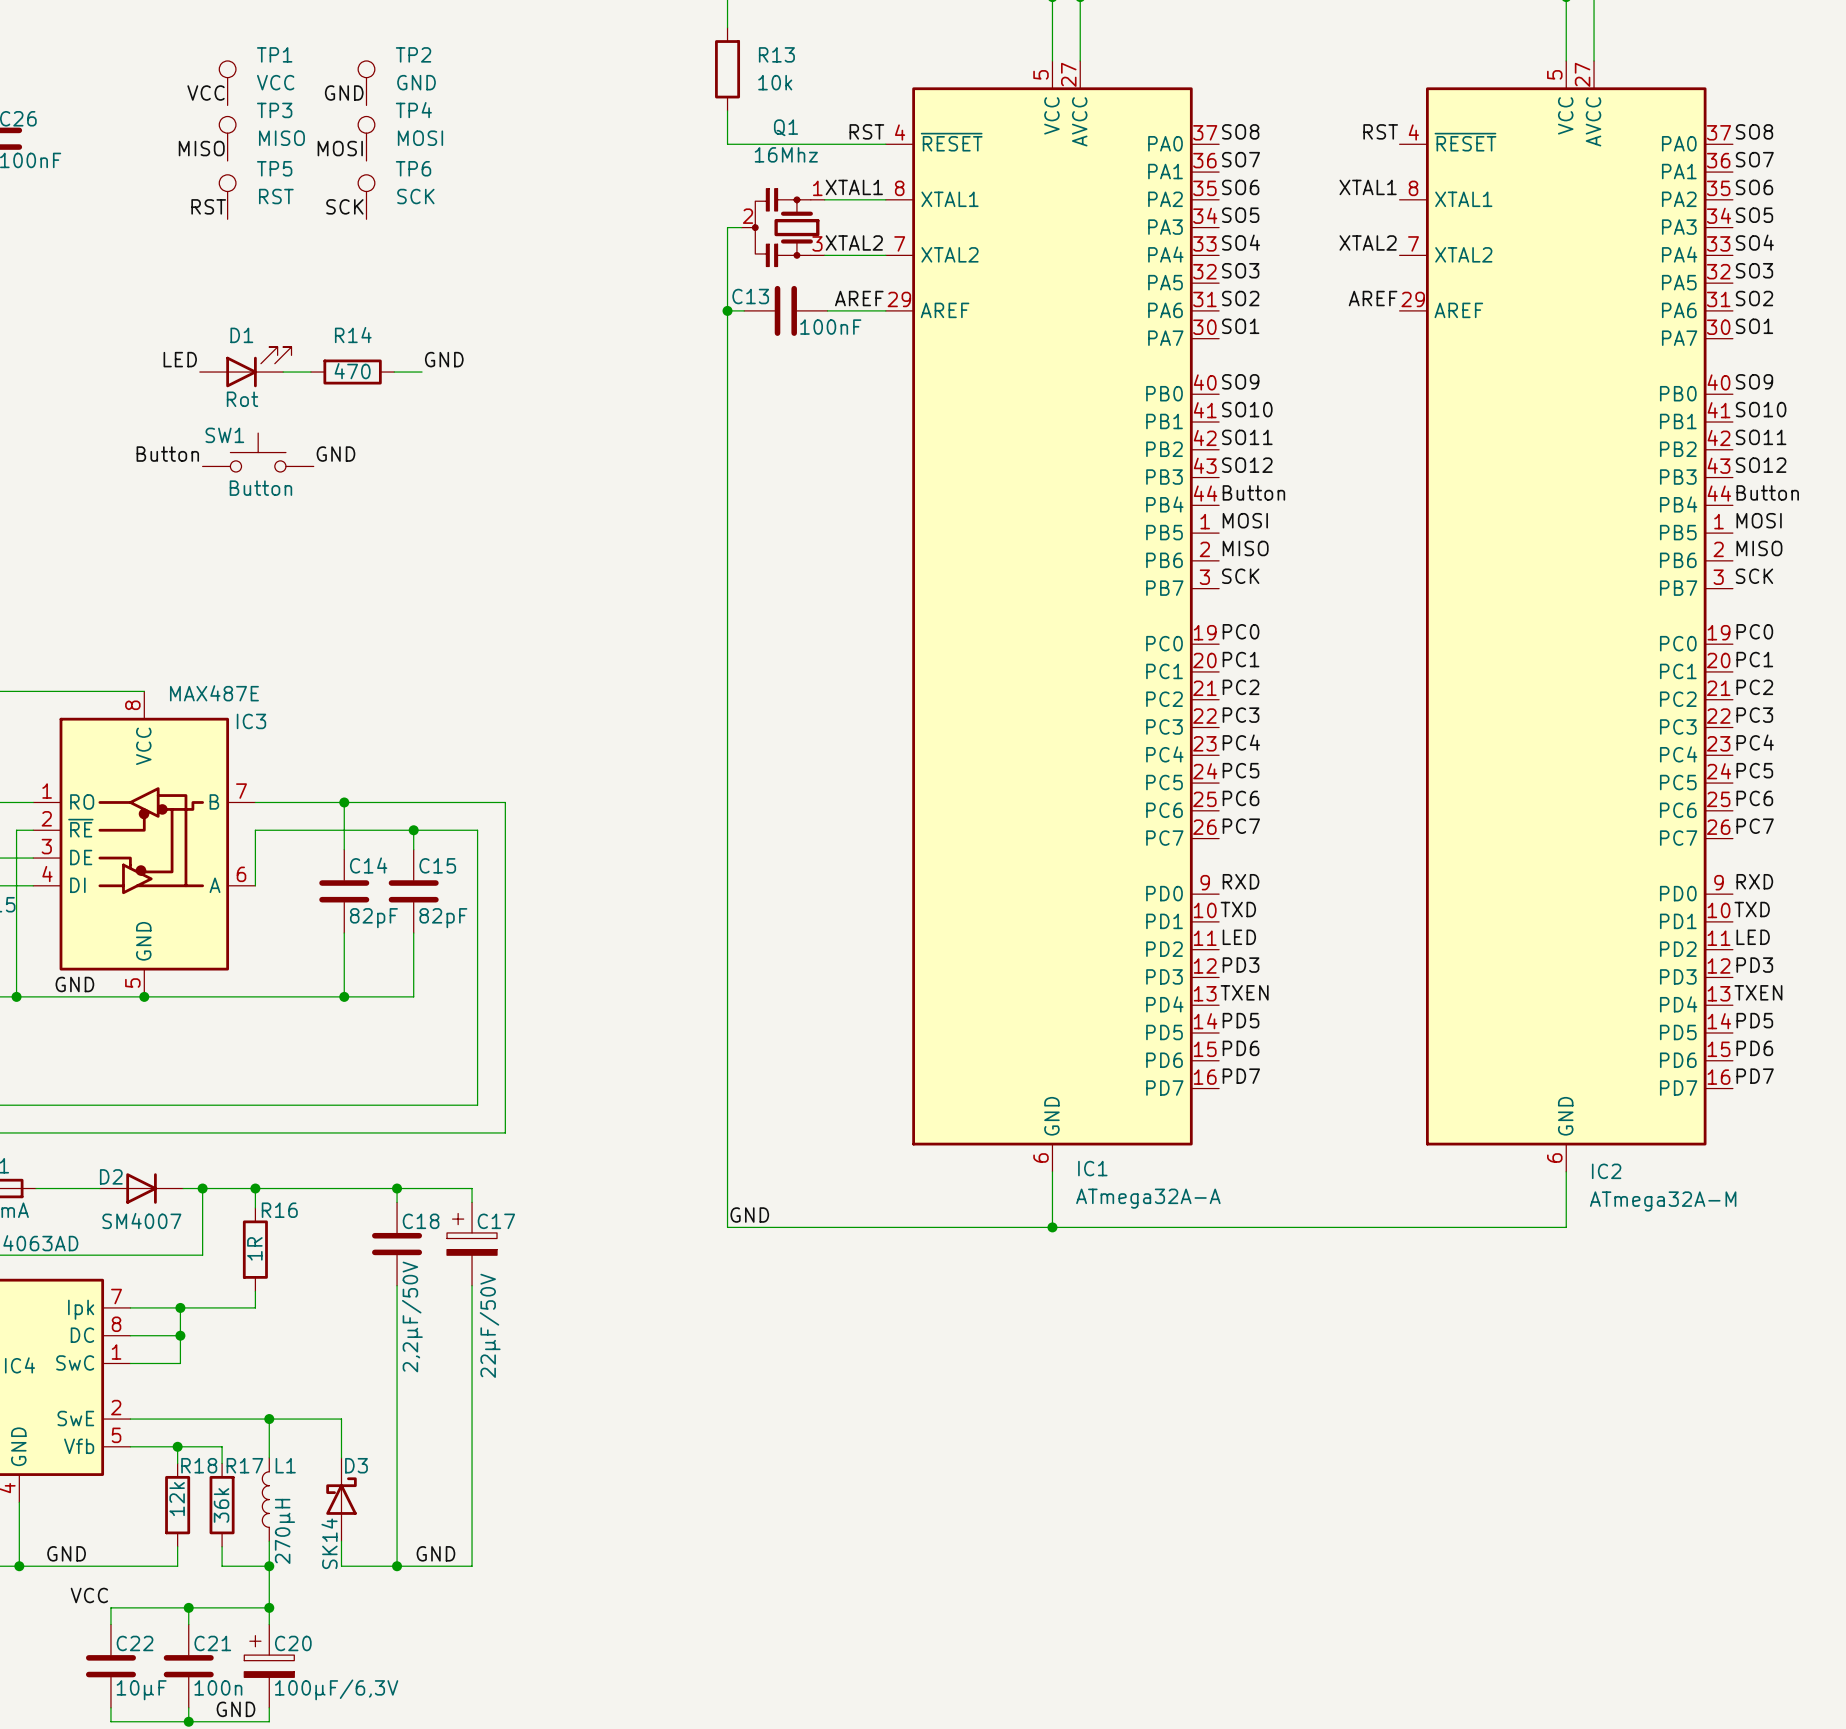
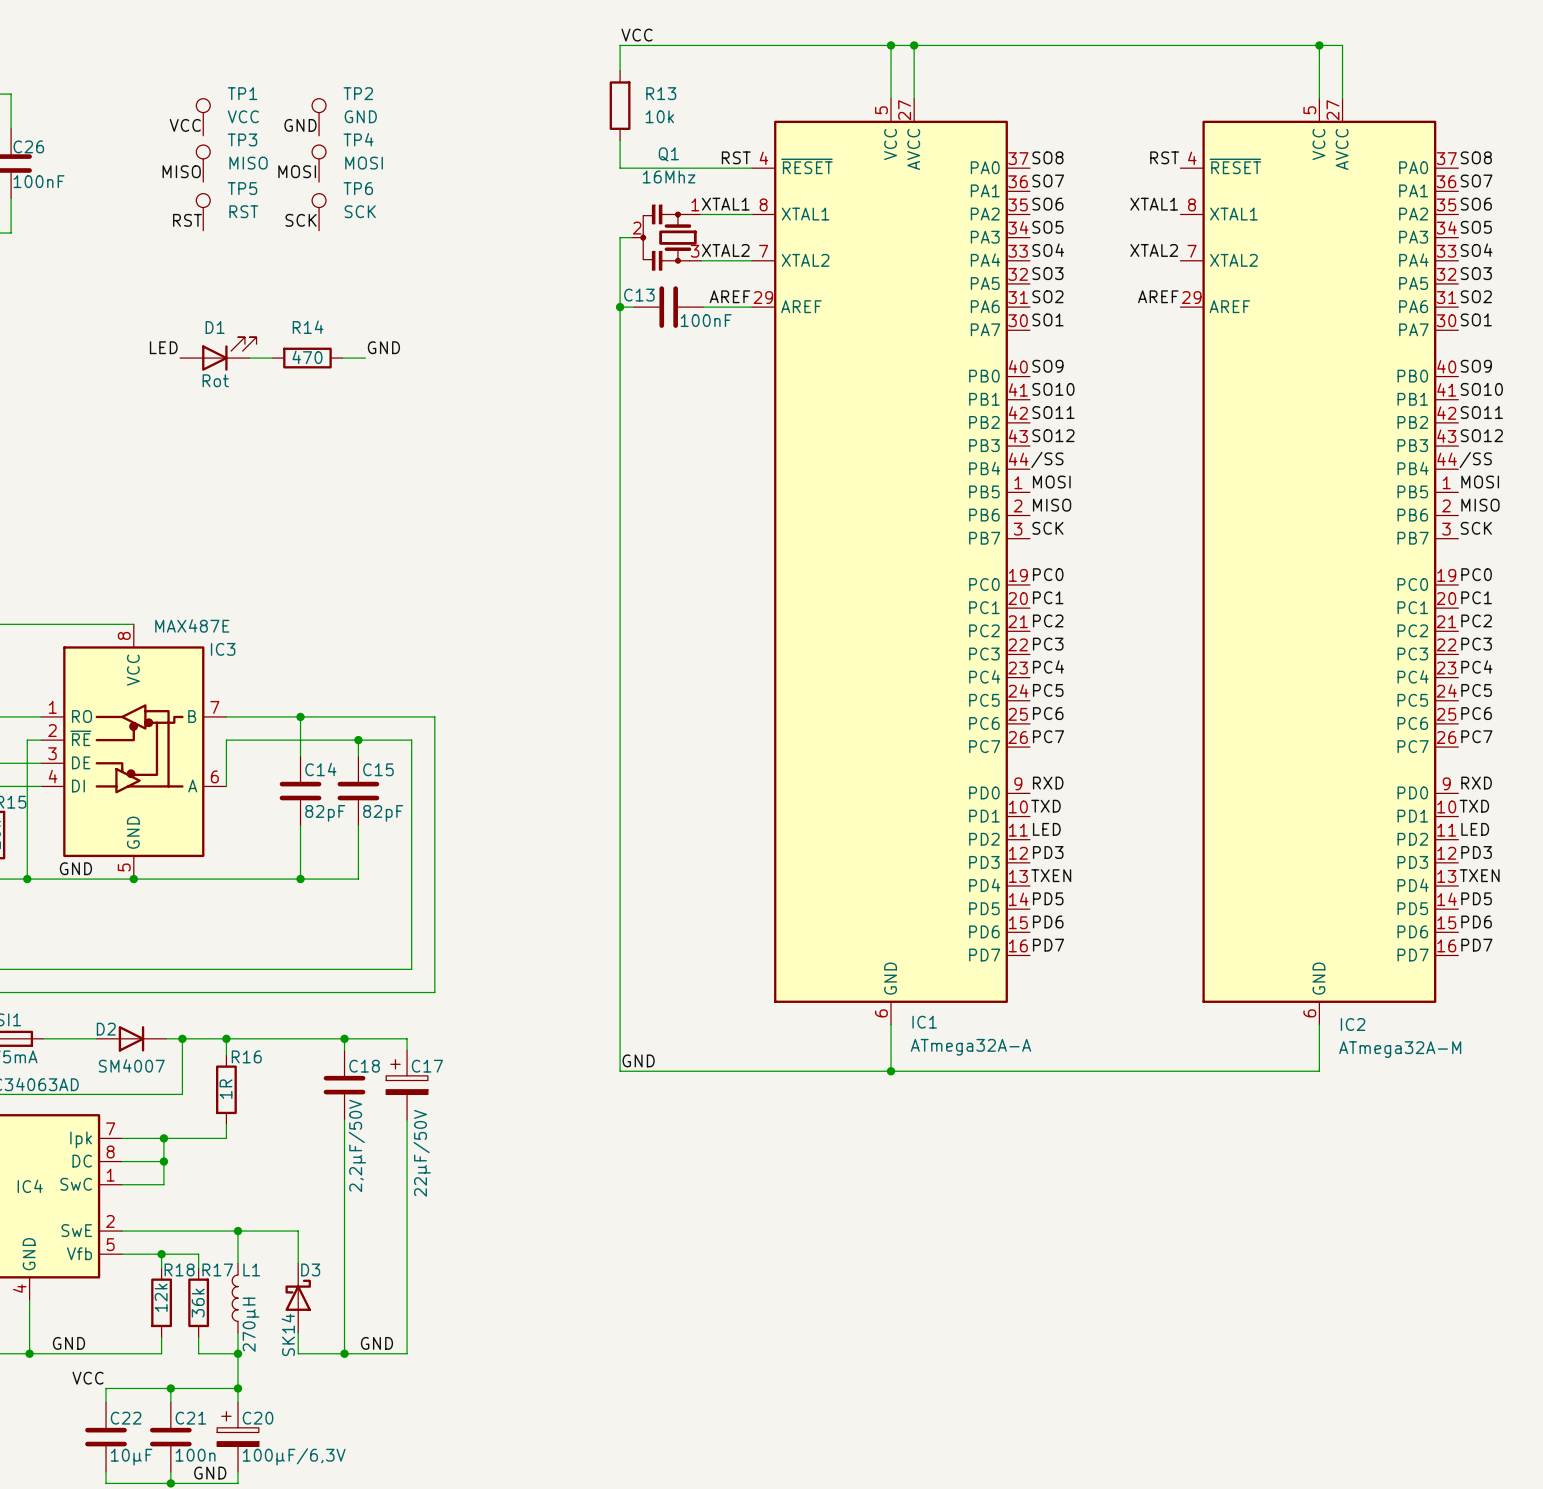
SW1: Button (258, 452) -> none
label: Button (167, 454) -> none
label: GND (335, 454) -> none
label: Button (1253, 492) -> /SS (1047, 459)
label: Button (1767, 492) -> /SS (1475, 459)

